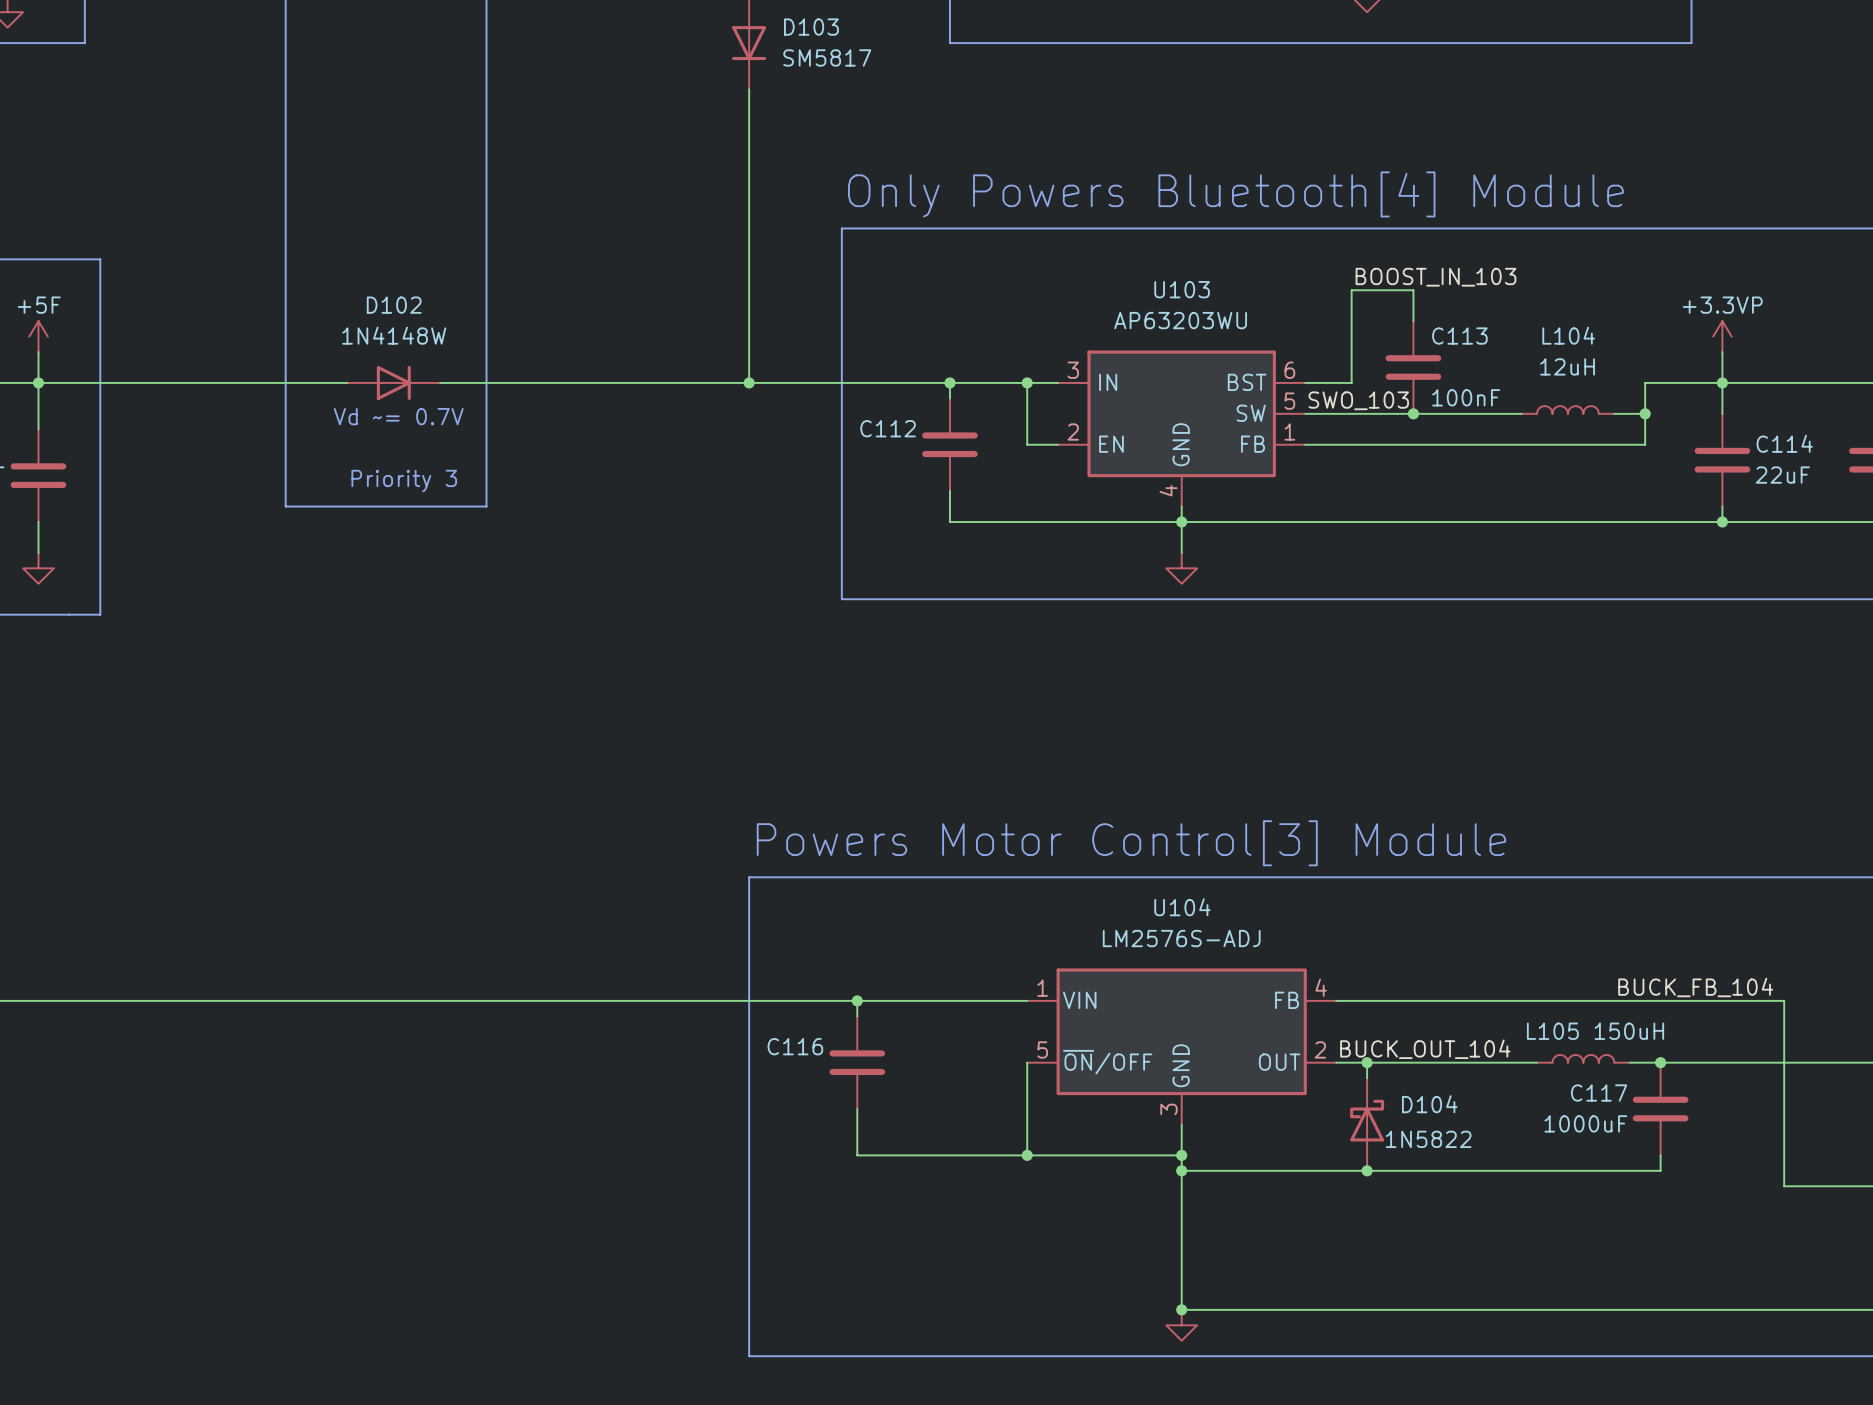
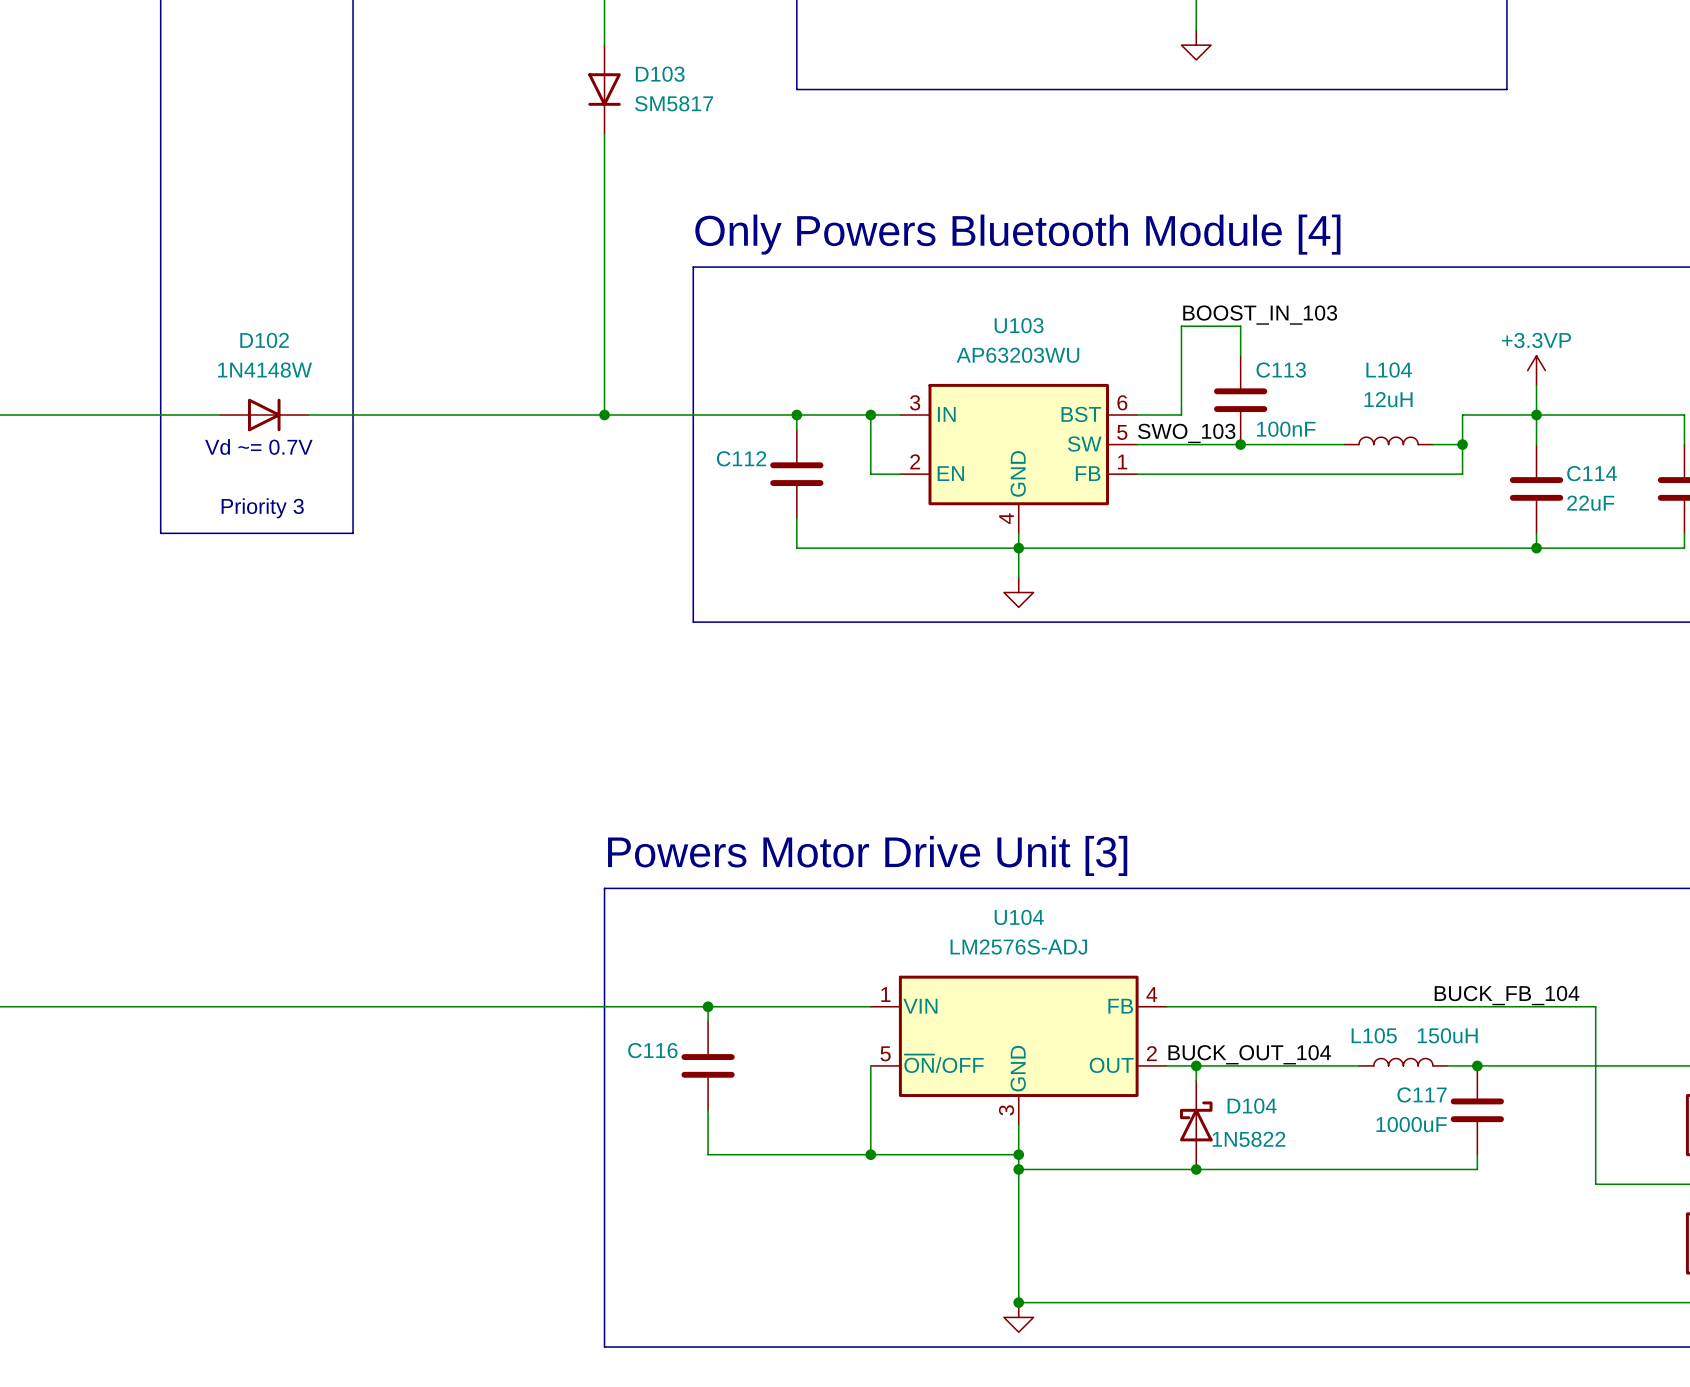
text: Only Powers Bluetooth[4] Module (1235, 194) -> Only Powers Bluetooth Module [4] (1017, 234)
text: Powers Motor Control[3] Module (1131, 843) -> Powers Motor Drive Unit [3] (867, 855)

